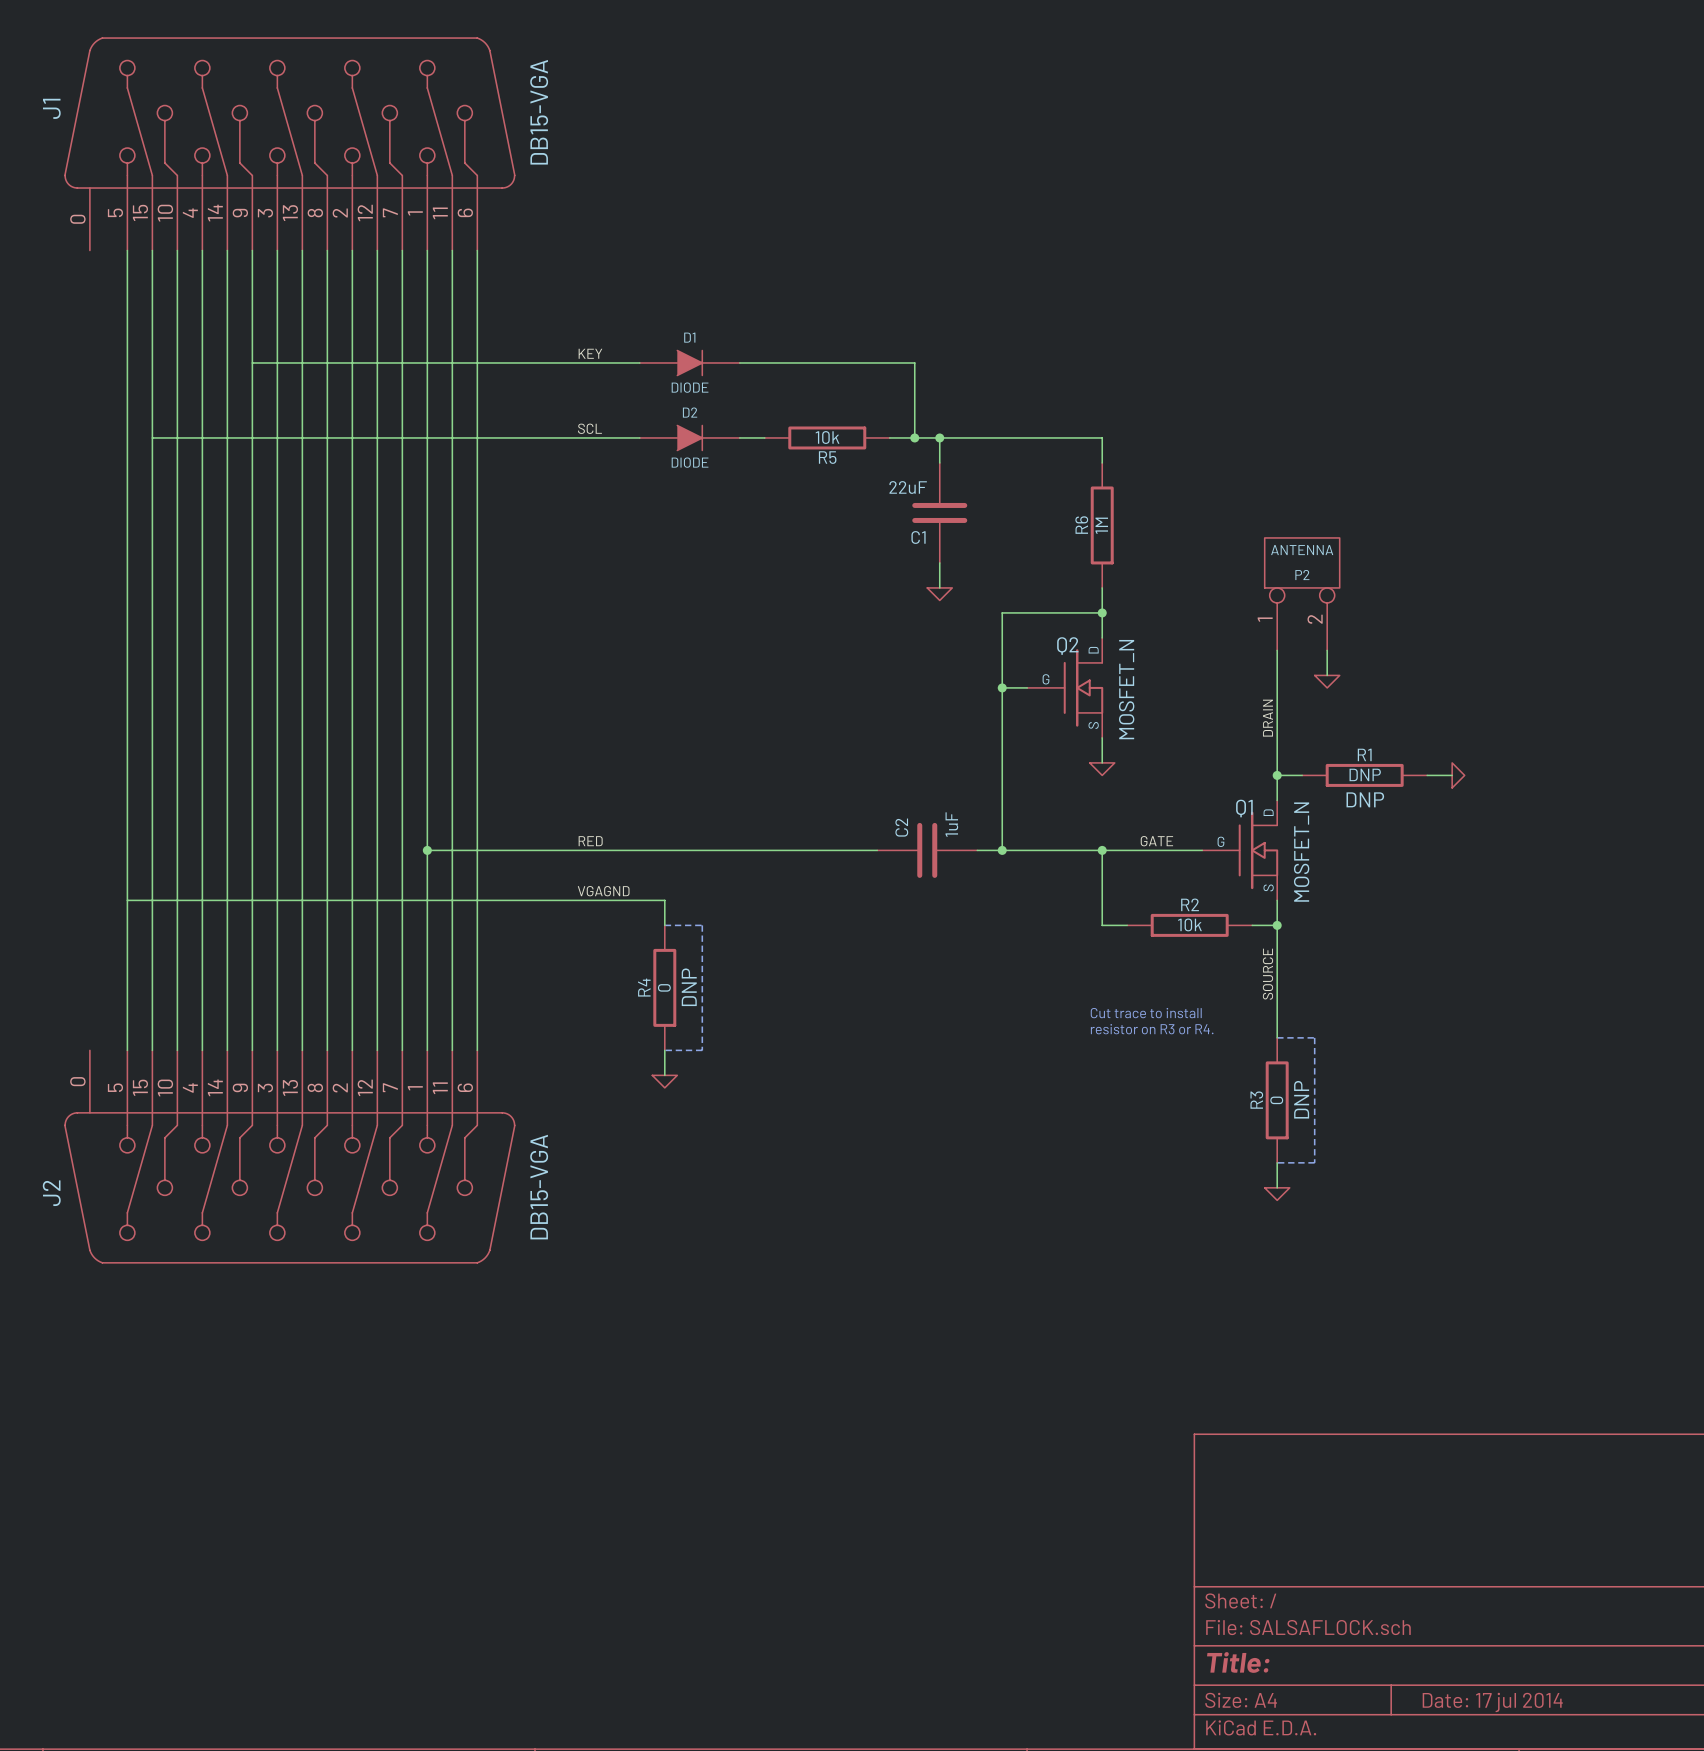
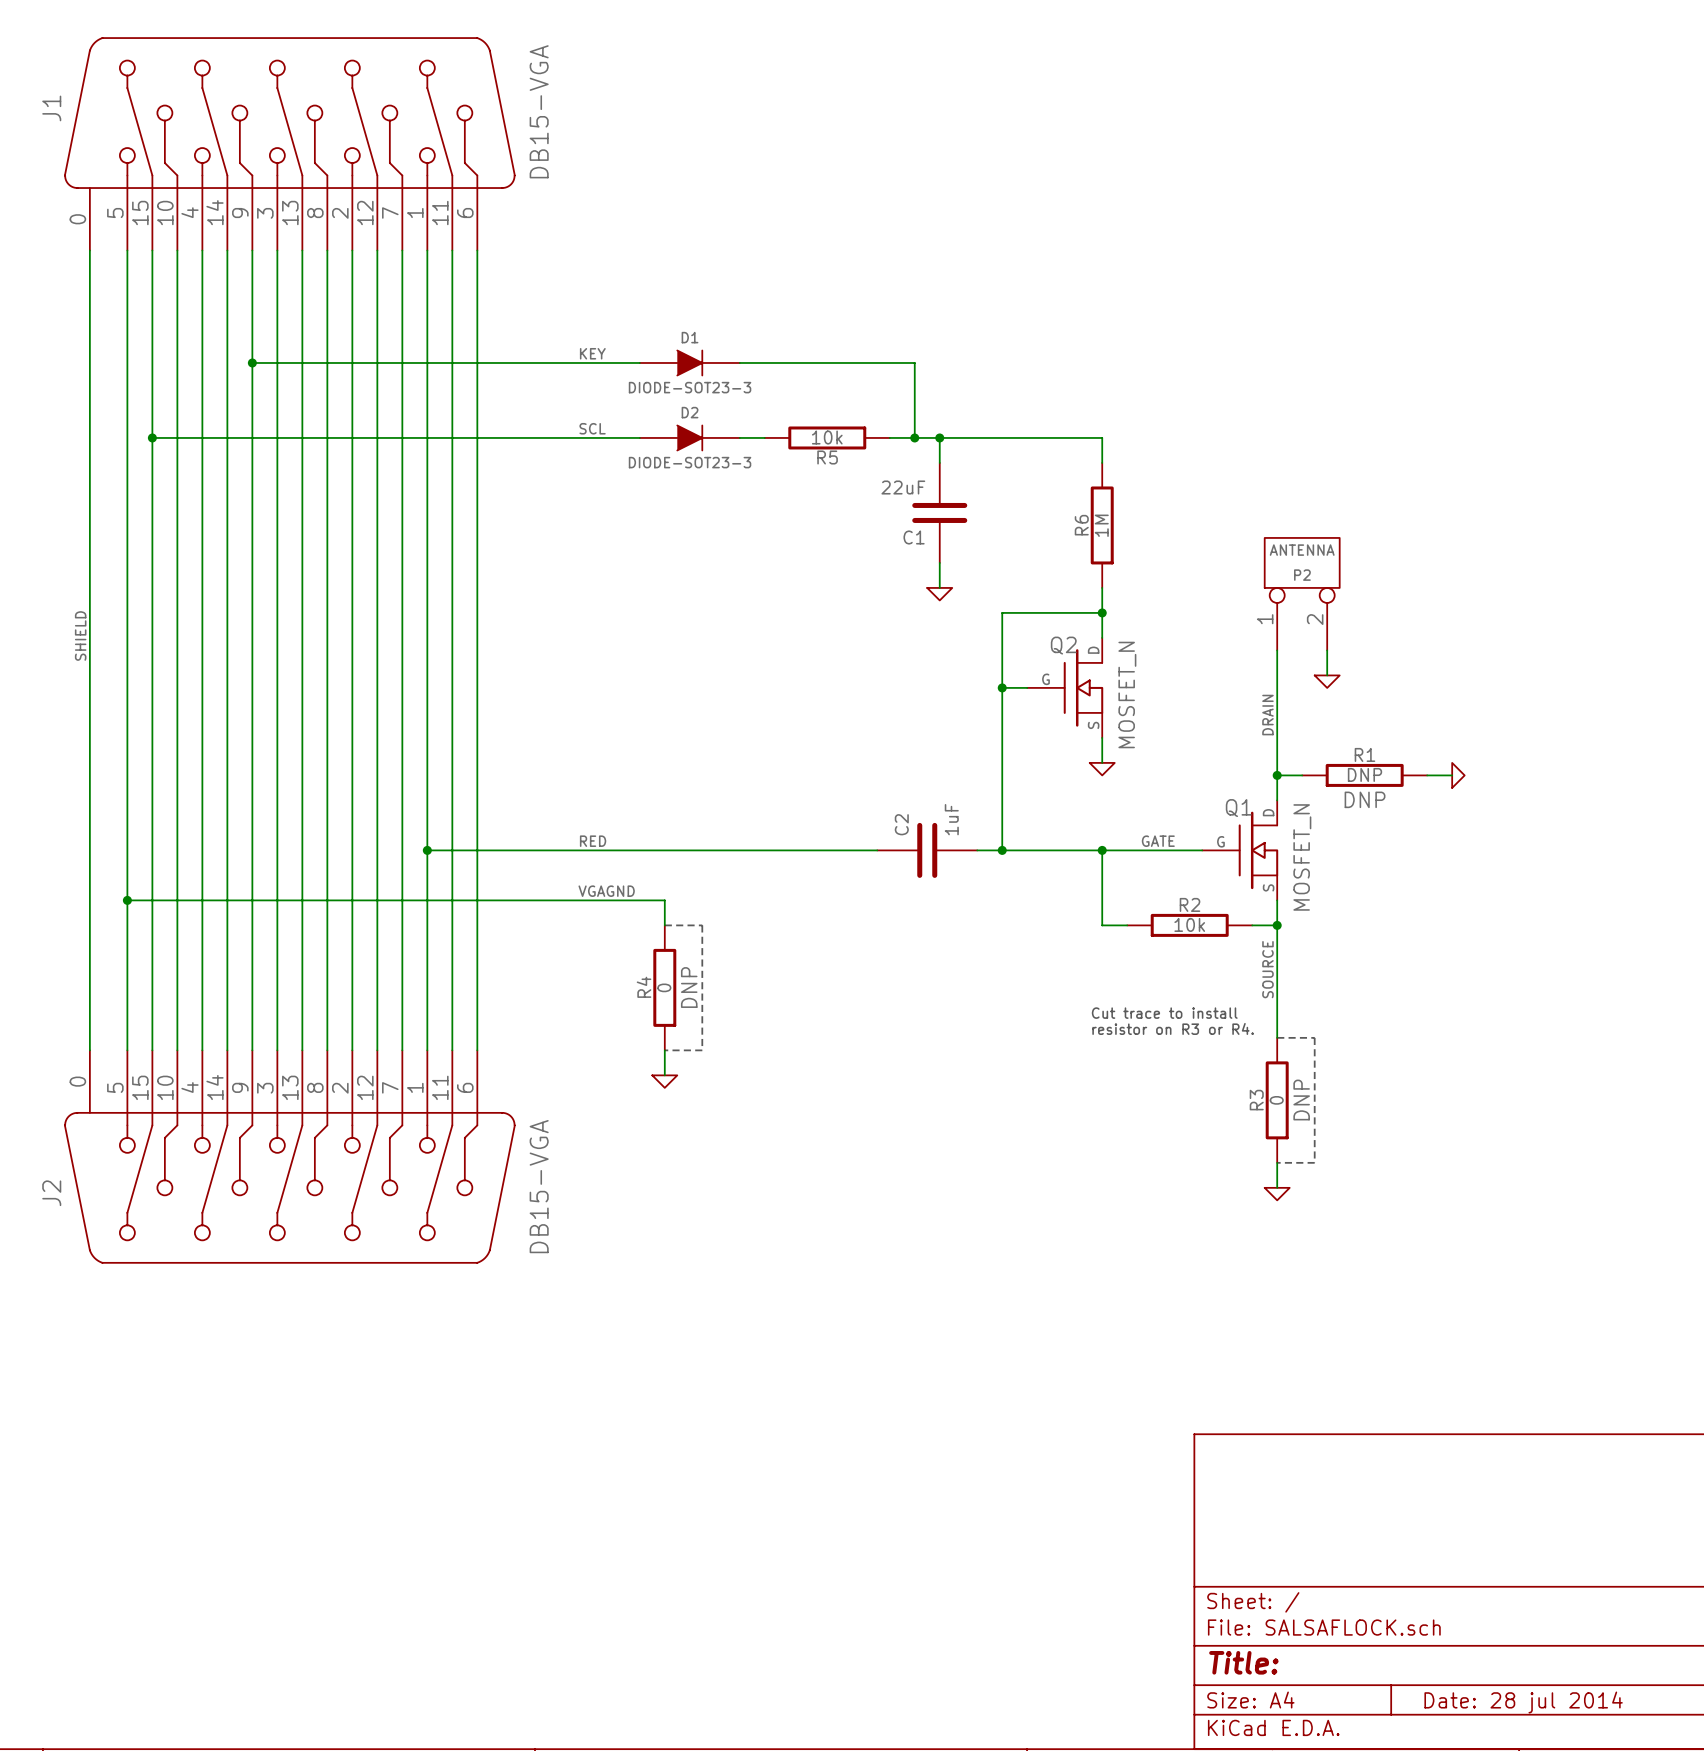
wire: none -> (89, 250) (89, 1050)
junction: none -> (252, 362)
D1 value: DIODE (690, 387) -> DIODE-SOT23-3 (690, 387)
junction: none -> (152, 437)
D2 value: DIODE (690, 462) -> DIODE-SOT23-3 (690, 462)
label: none -> SHIELD (80, 636)
junction: none -> (127, 900)
title block: Date: 17 jul 2014 (1492, 1702) -> Date: 28 jul 2014 (1523, 1702)

